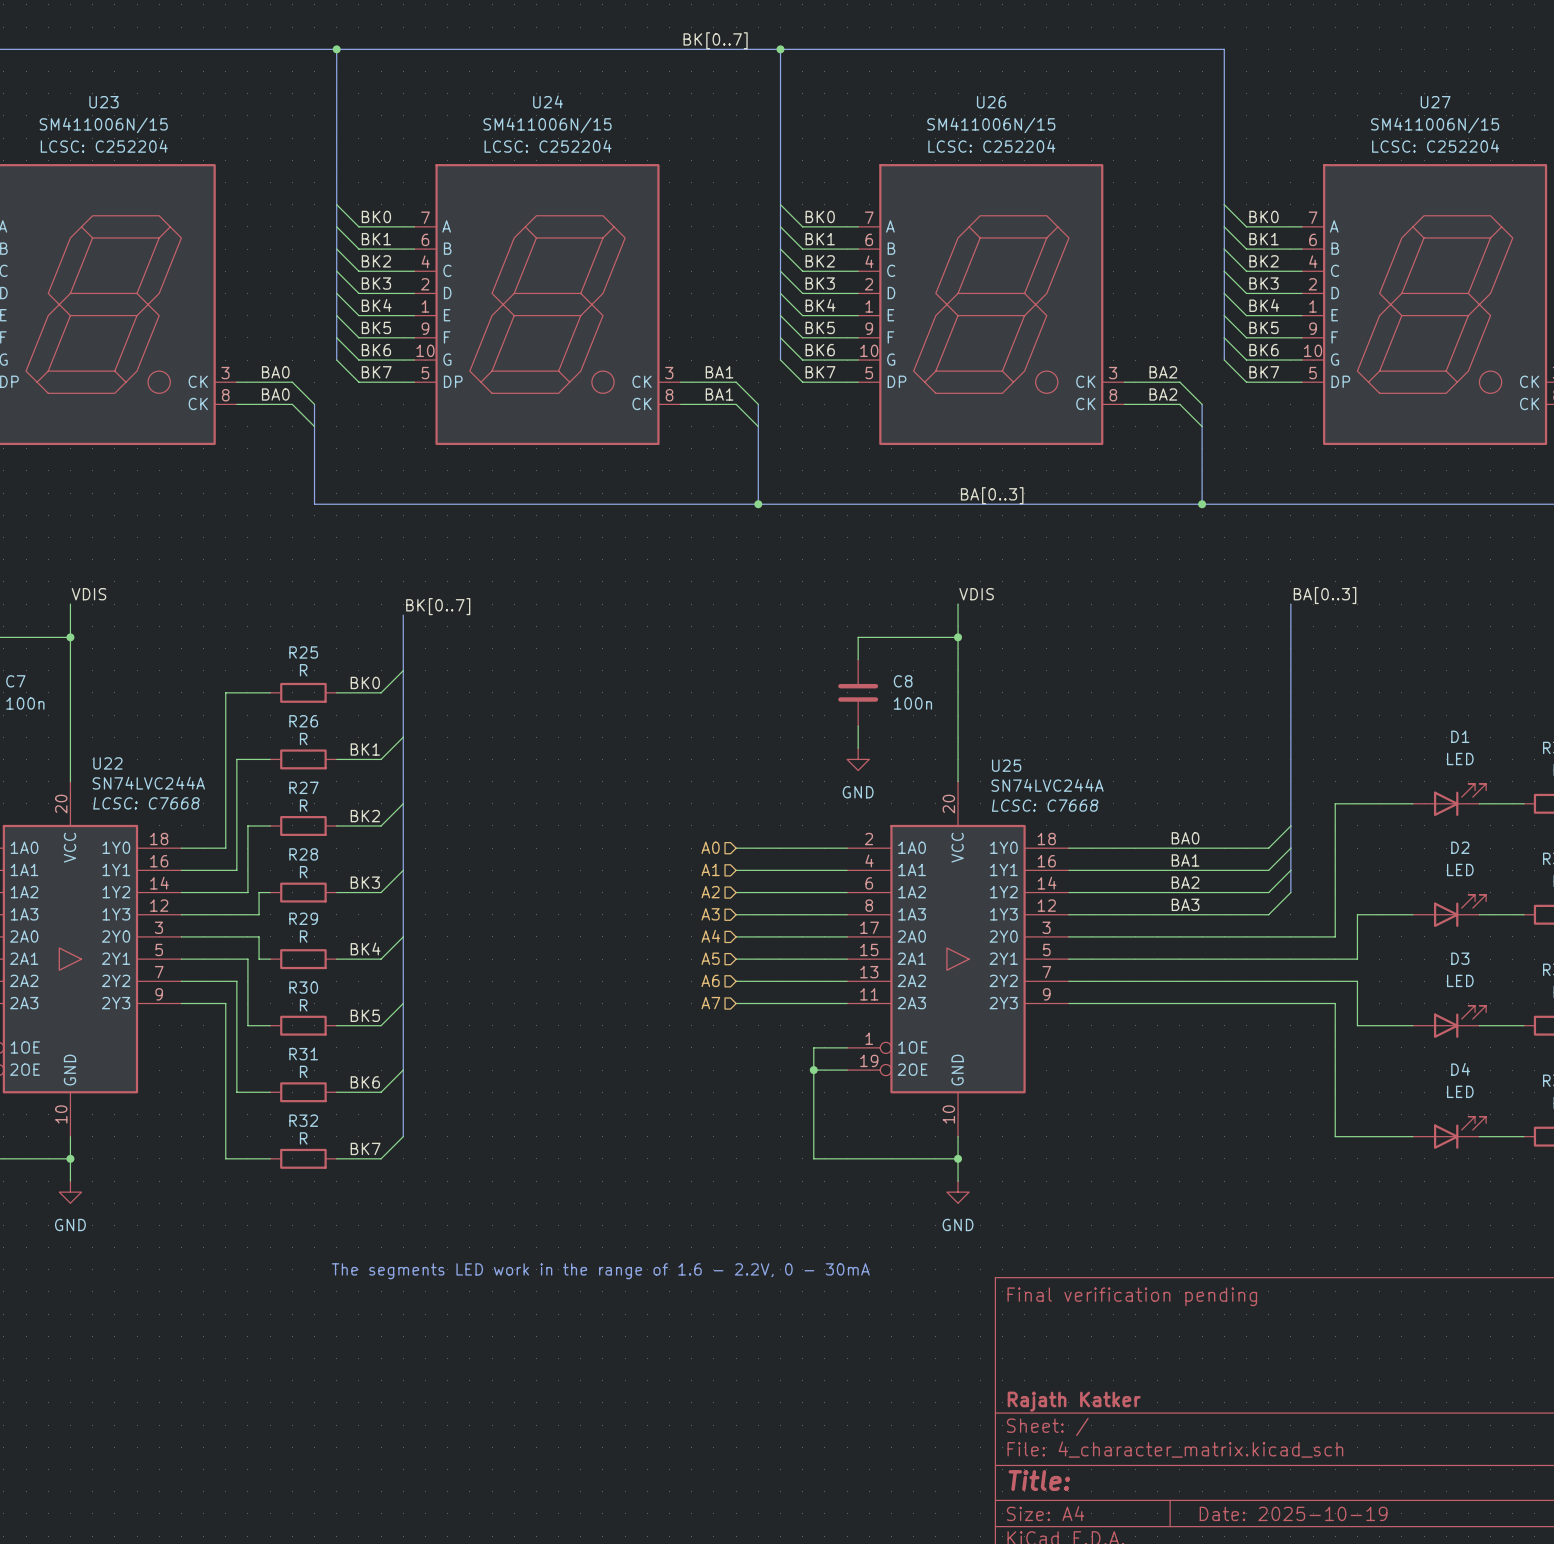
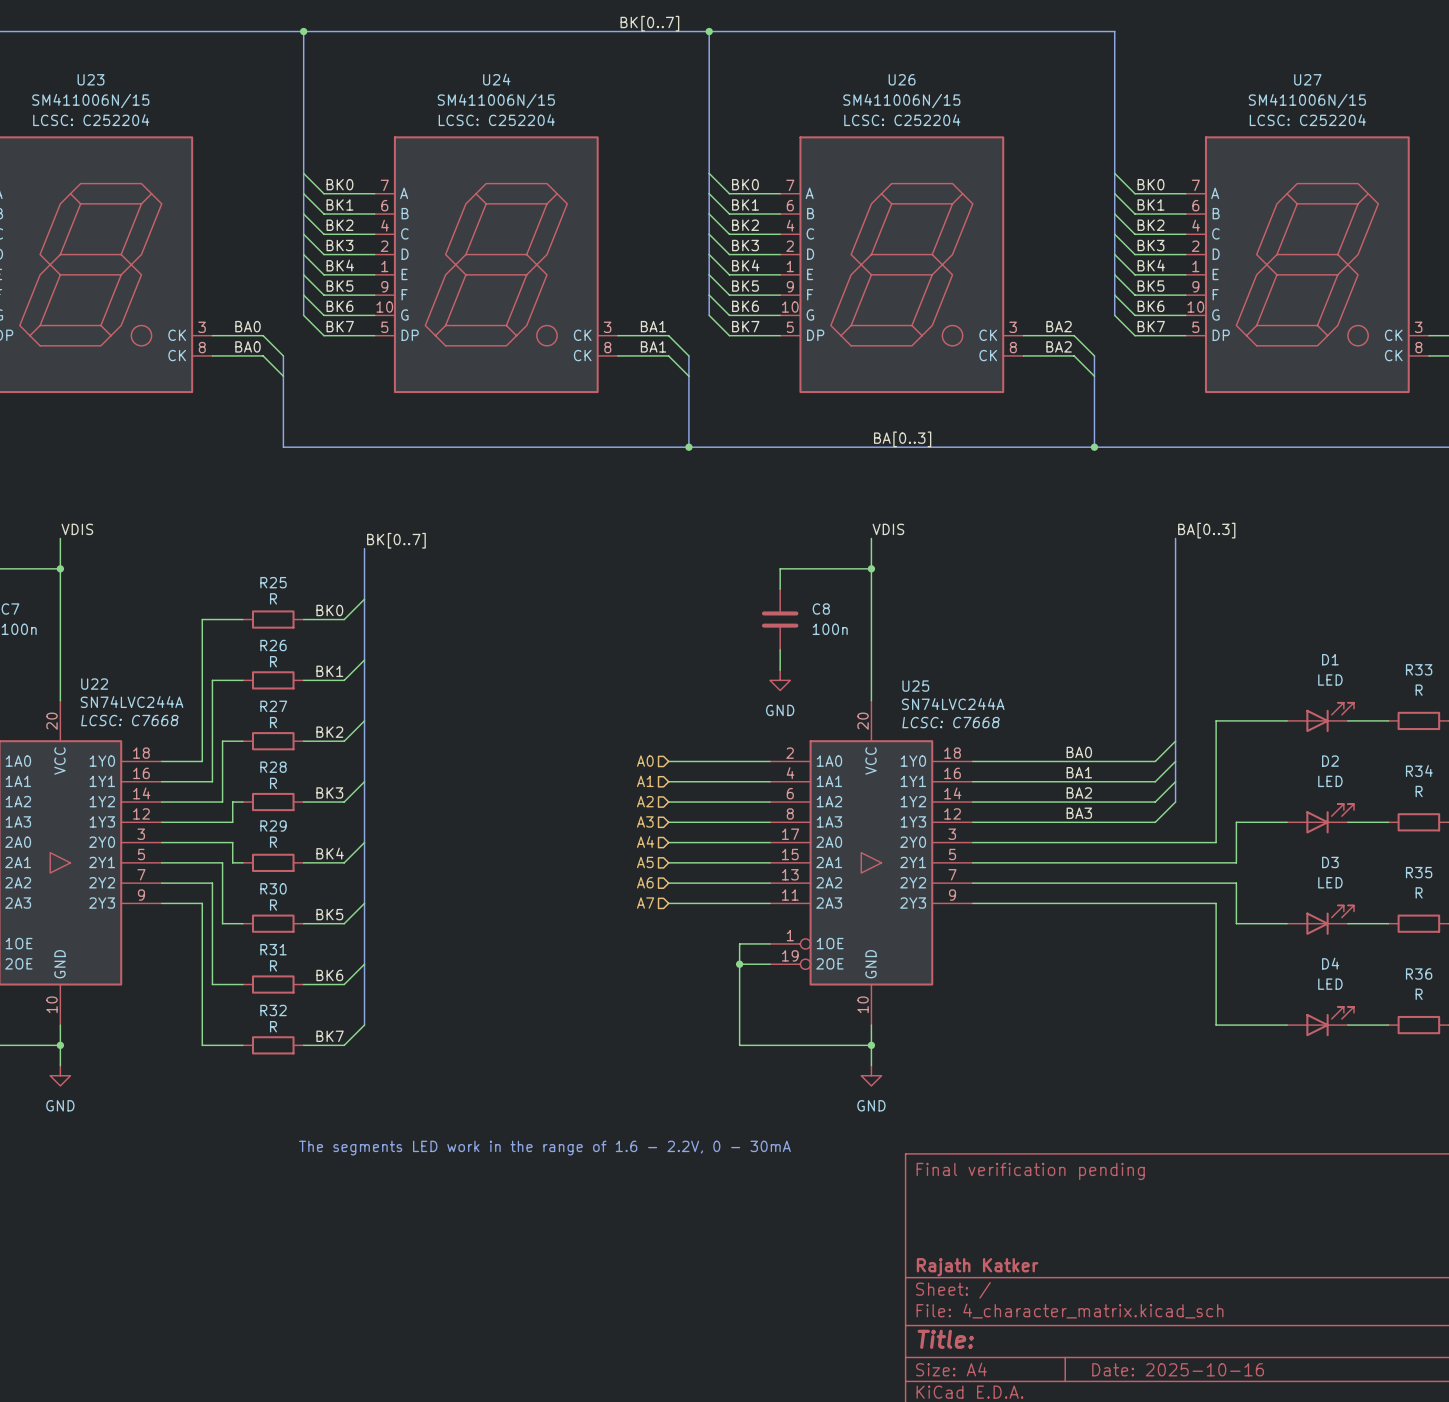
title block: Date: 2025-10-19 (1293, 1513) -> Date: 2025-10-16 (1178, 1369)

